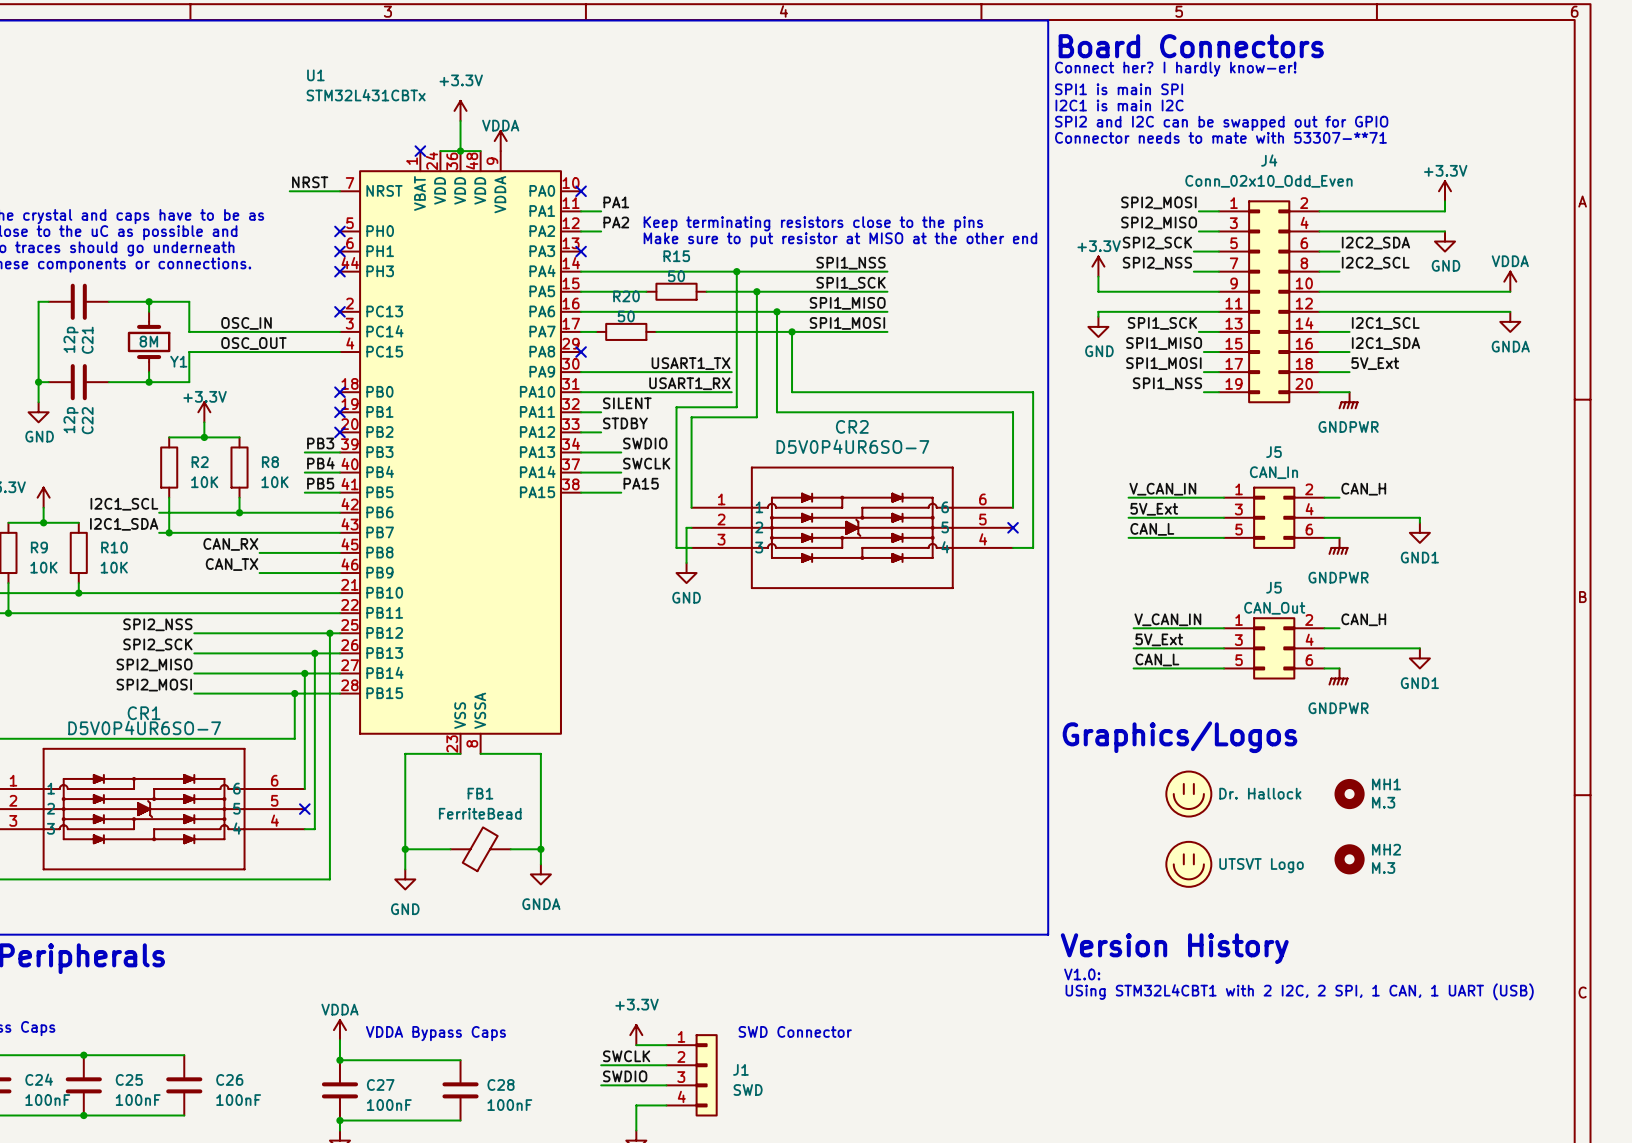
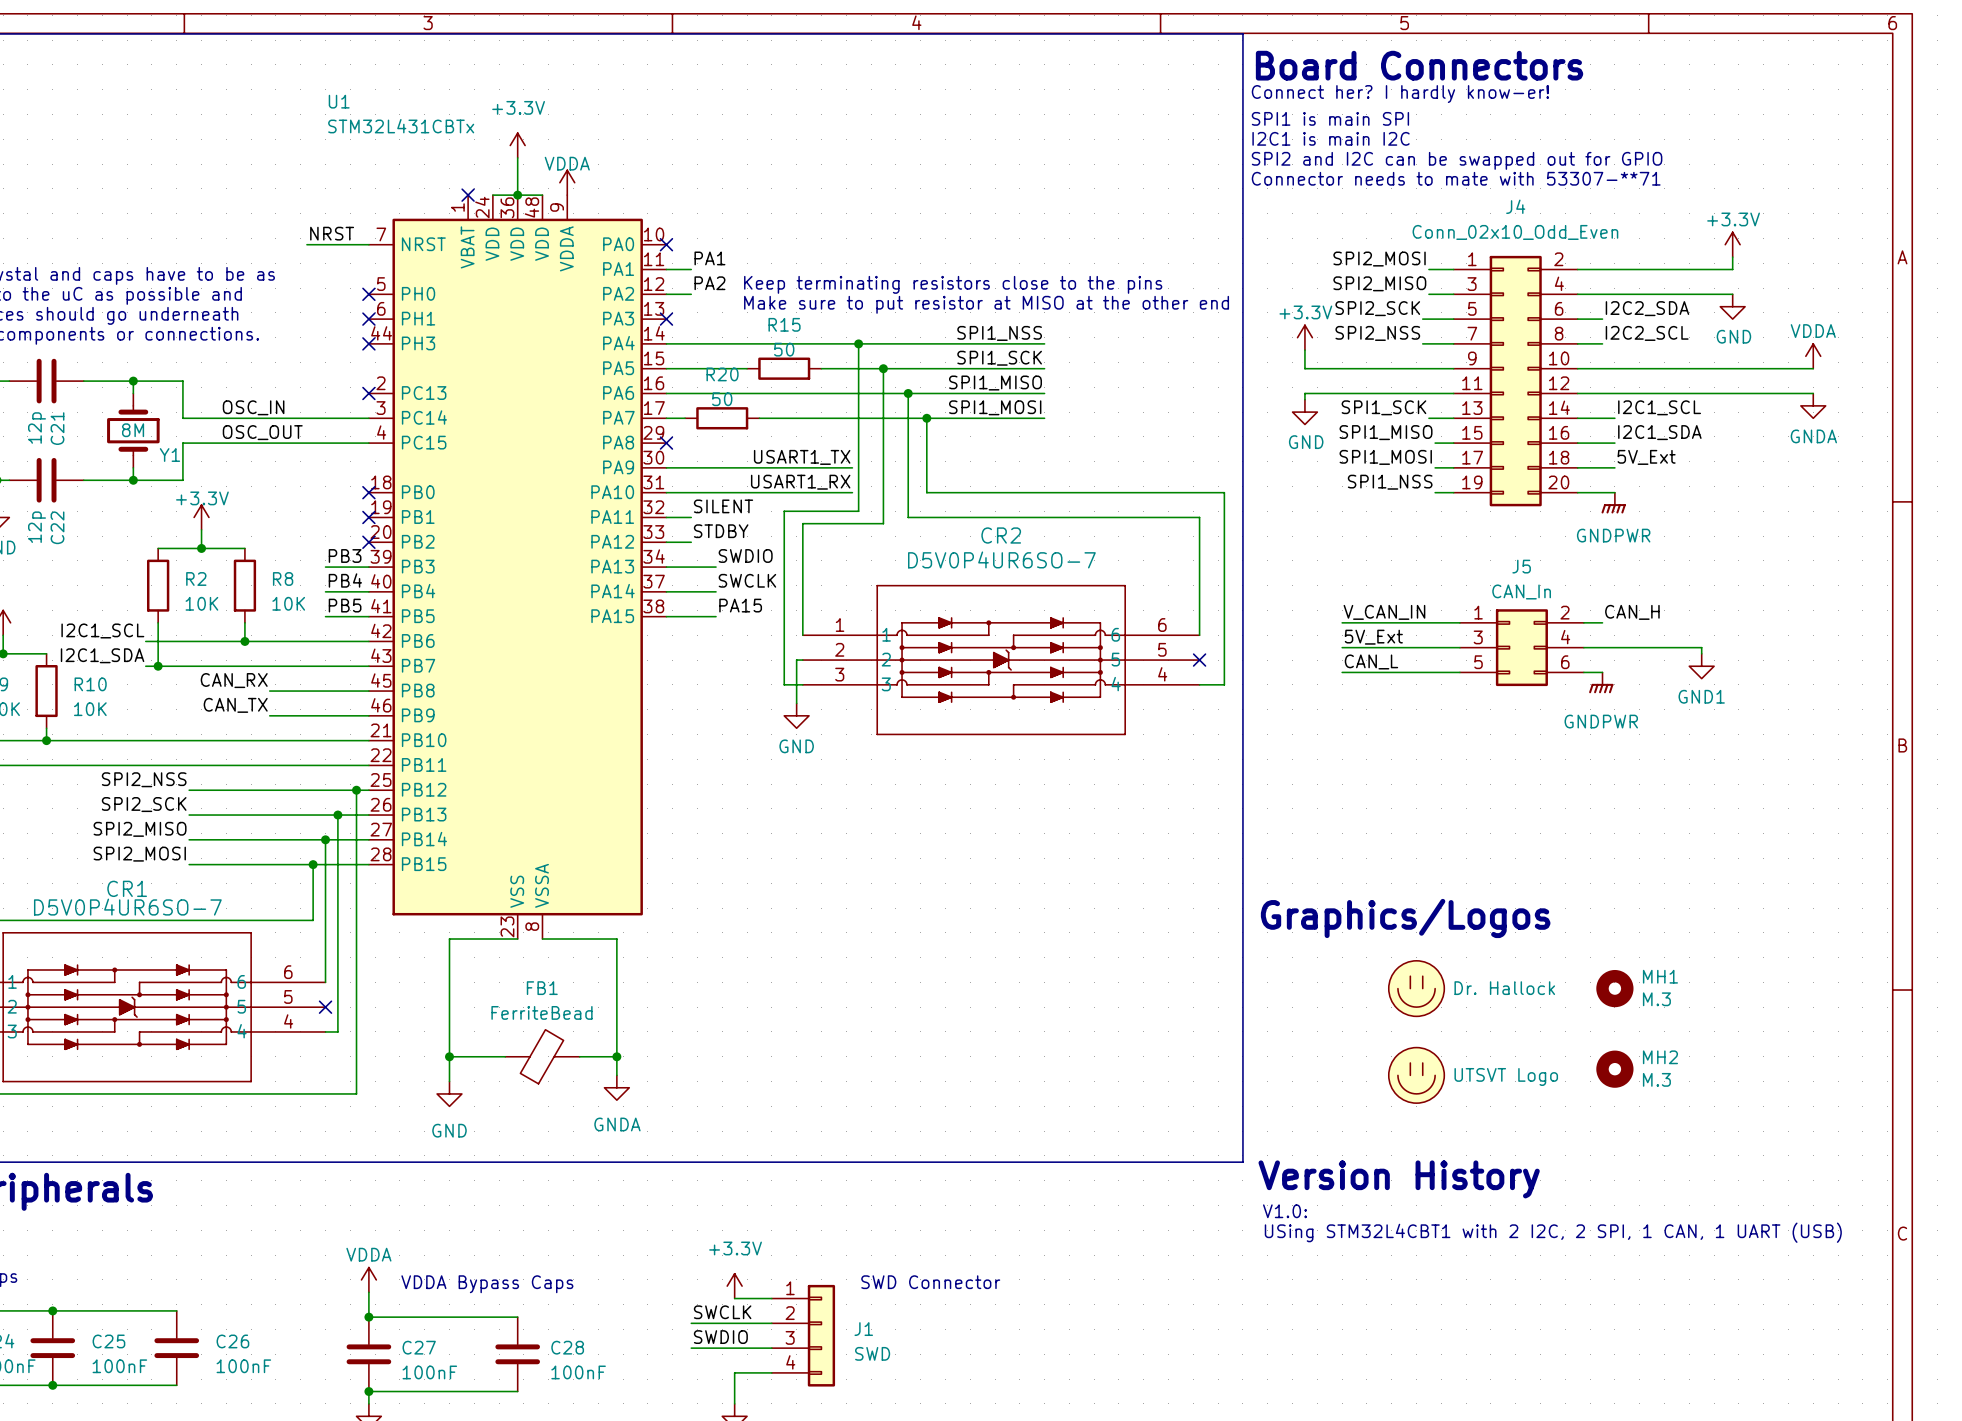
label: V_CAN_IN (1167, 619) -> none
label: CAN_H (1363, 619) -> none
wire: (1133, 628) (1223, 628) -> none
wire: (1324, 628) (1339, 628) -> none
label: 5V_Ext (1159, 639) -> none
wire: (1133, 648) (1223, 648) -> none
J5: CAN_Out (1274, 648) -> none
wire: (1324, 648) (1419, 648) -> none
power symbol: GND1 (1419, 658) -> none
label: CAN_L (1157, 659) -> none
wire: (1133, 668) (1223, 668) -> none
wire: (1324, 668) (1339, 668) -> none
power symbol: GNDPWR (1338, 676) -> none

